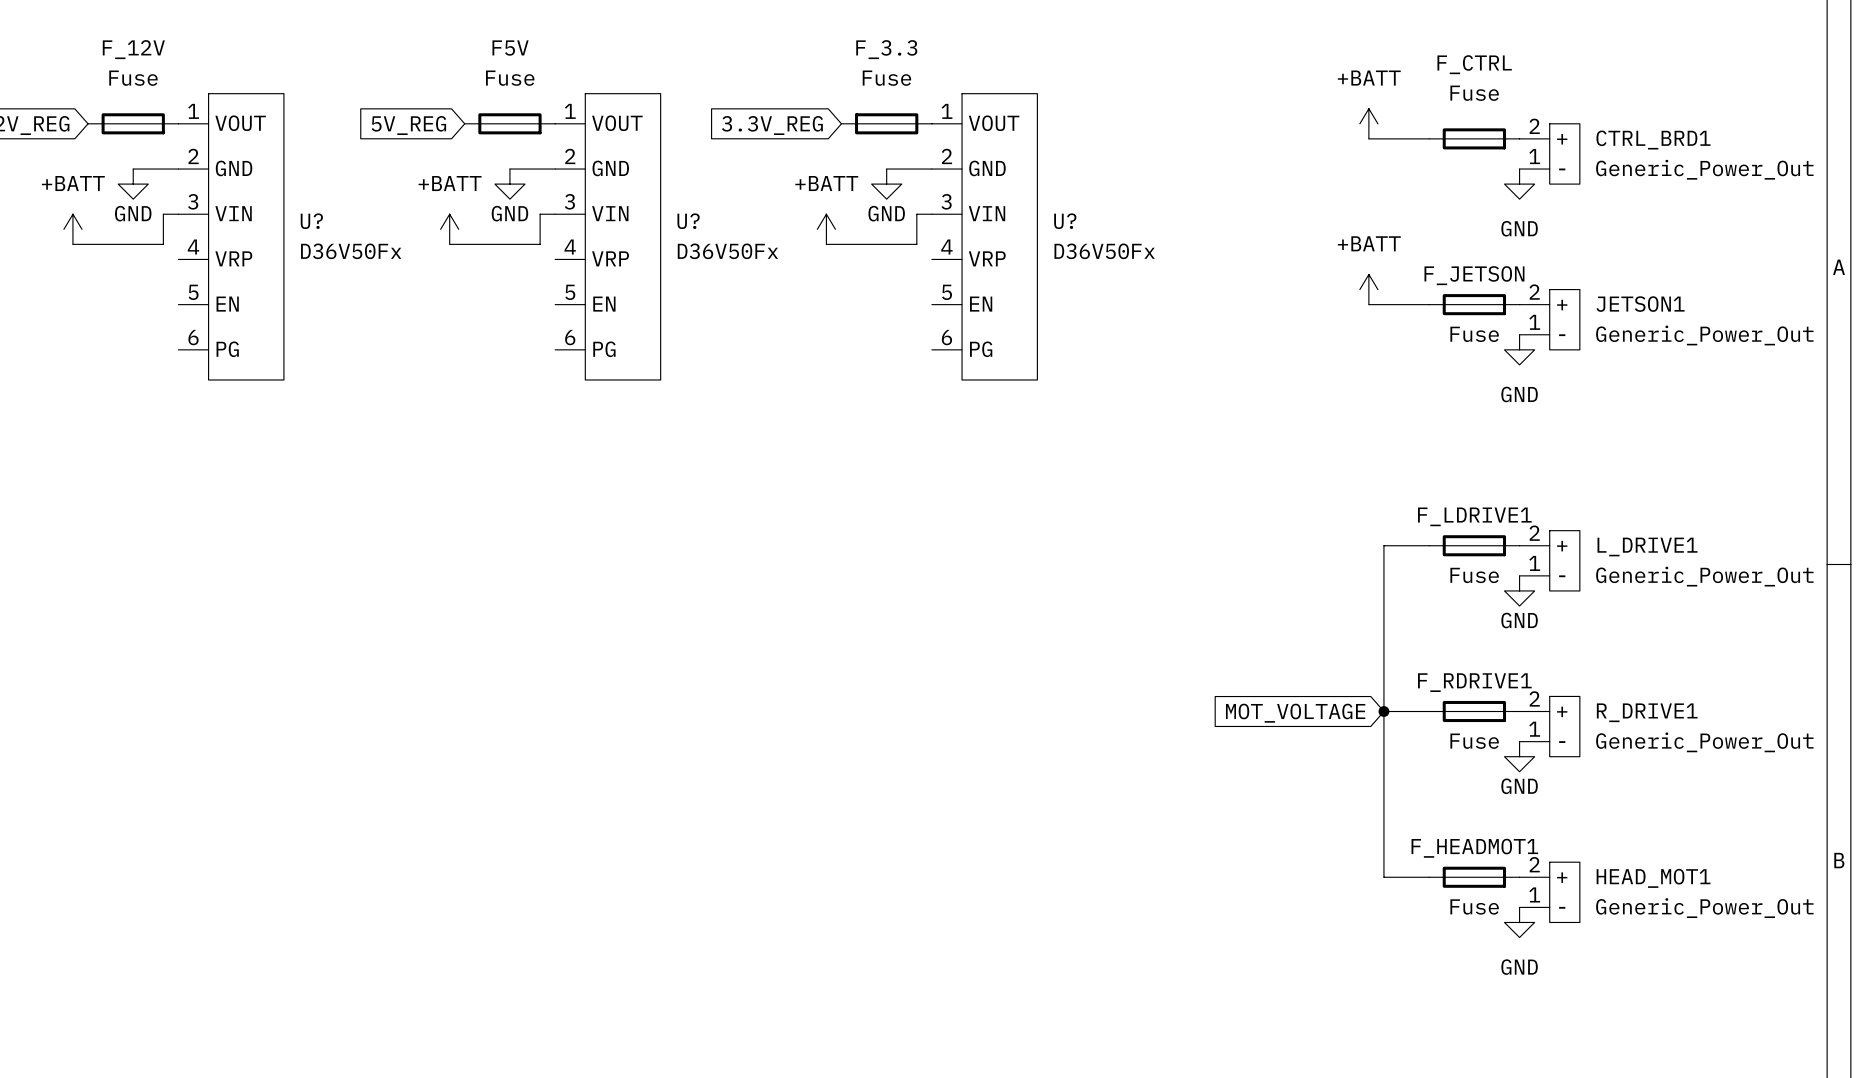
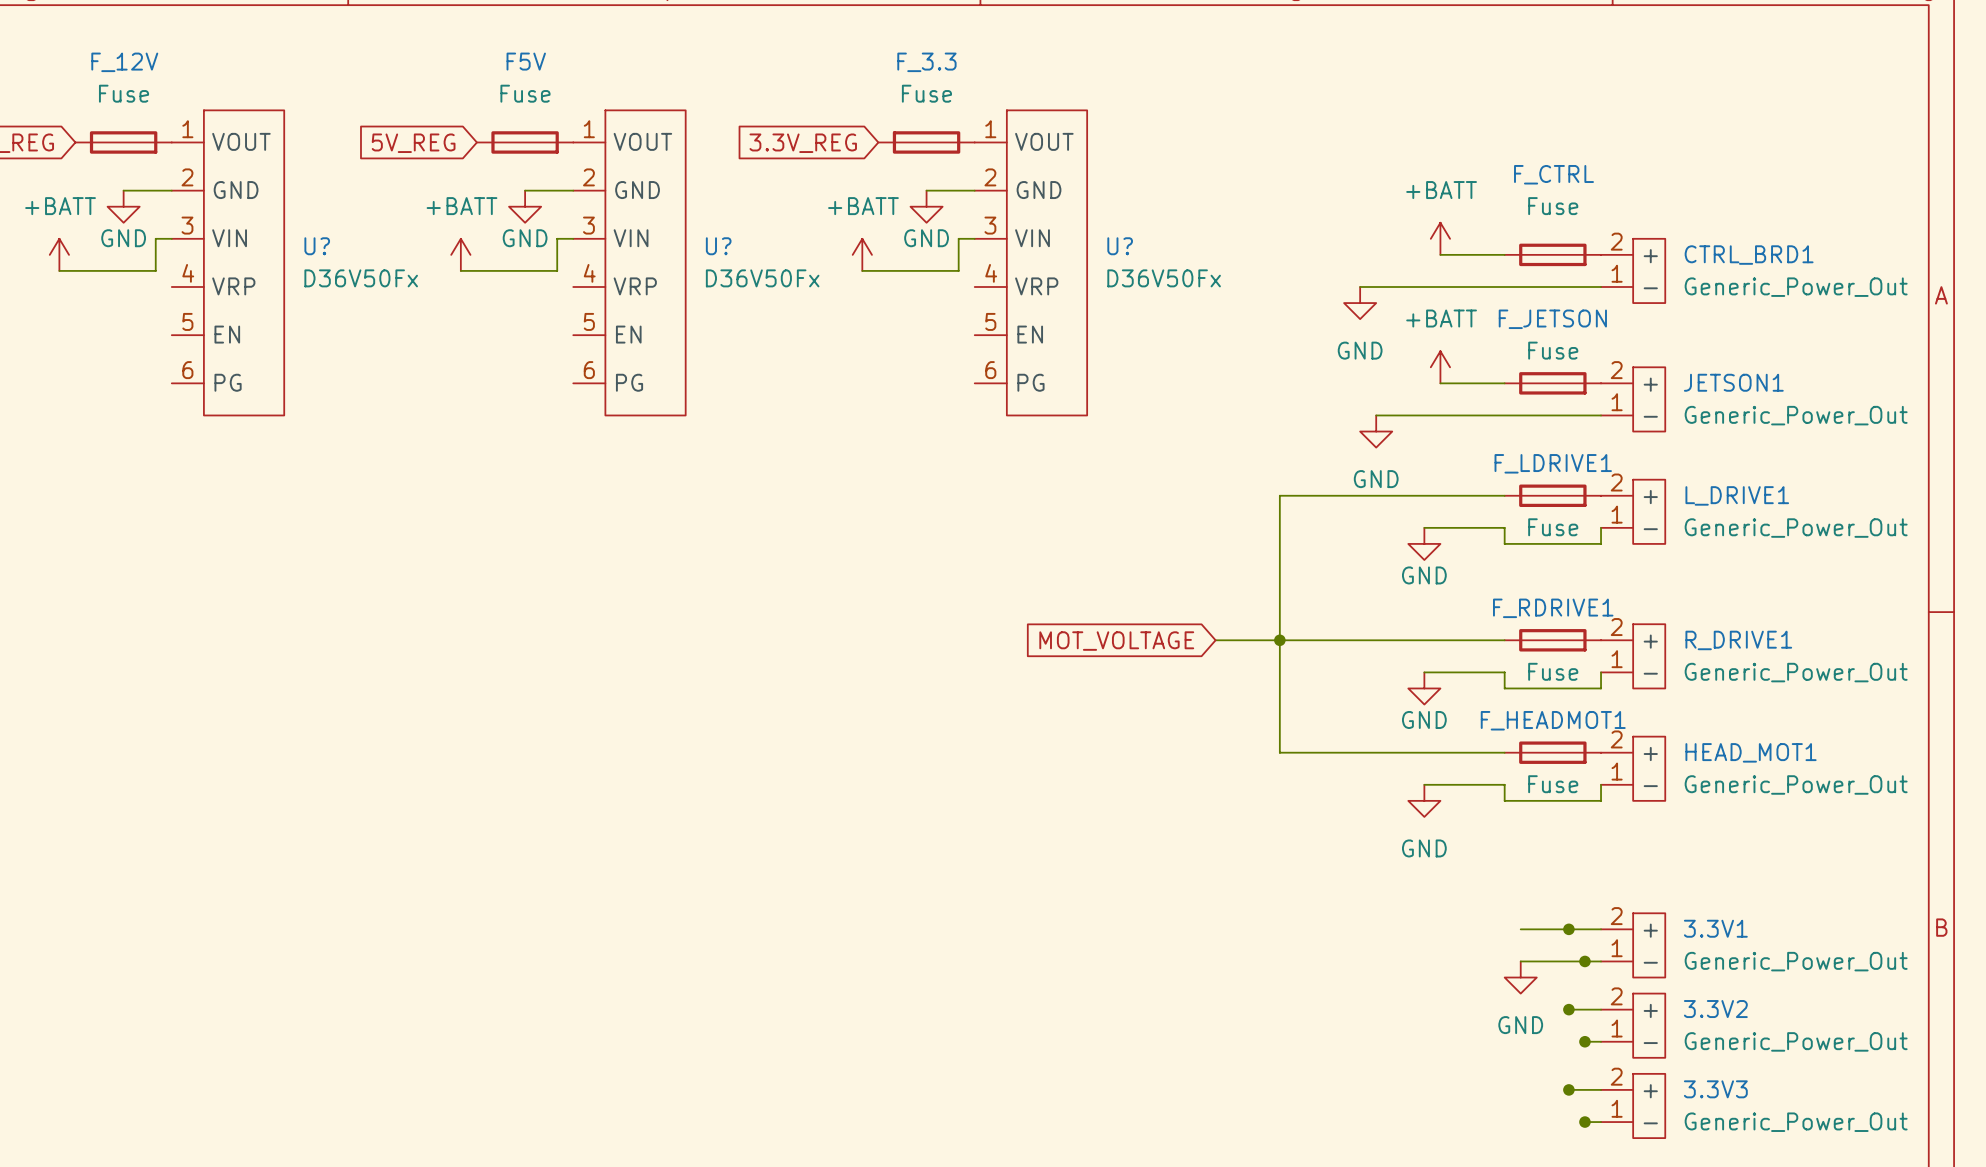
power symbol: +BATT (1368, 123) -> none
wire: (1368, 138) (1429, 138) -> (1440, 254) (1504, 254)
F_CTRL position: (1474, 138) -> (1552, 254)
CTRL_BRD1 position: (1549, 153) -> (1633, 270)
power symbol: GND (1519, 184) -> none
power symbol: none -> +BATT (1440, 238)
wire: none -> (1360, 287) (1601, 287)
power symbol: none -> GND (1360, 303)
F_JETSON name position: F_JETSON (1474, 275) -> F_JETSON (1552, 319)
power symbol: +BATT (1368, 289) -> none
wire: (1368, 304) (1429, 304) -> (1440, 383) (1504, 383)
F_JETSON position: (1474, 304) -> (1552, 383)
JETSON1 position: (1549, 319) -> (1633, 399)
power symbol: none -> +BATT (1440, 367)
F_JETSON value position: Fuse (1474, 334) -> Fuse (1553, 350)
power symbol: GND (1519, 349) -> none
wire: none -> (1376, 415) (1601, 415)
power symbol: none -> GND (1376, 431)
wire: none -> (1504, 495) (1279, 495) (1279, 752) (1504, 752)
wire: none -> (1424, 527) (1504, 527) (1504, 543) (1601, 543) (1601, 527)
power symbol: none -> GND (1424, 543)
wire: (1429, 545) (1383, 545) (1383, 877) (1429, 877) -> none
F_LDRIVE1 position: (1474, 545) -> (1552, 495)
L_DRIVE1 position: (1549, 560) -> (1633, 511)
wire: none -> (1215, 640) (1504, 640)
junction: none -> (1279, 640)
power symbol: GND (1519, 590) -> none
wire: none -> (1424, 672) (1504, 672) (1504, 688) (1601, 688) (1601, 672)
power symbol: none -> GND (1424, 688)
wire: (1383, 711) (1429, 711) -> none
junction: (1383, 711) -> none
F_RDRIVE1 position: (1474, 711) -> (1552, 640)
global label position: MOT_VOLTAGE (1295, 713) -> MOT_VOLTAGE (1116, 641)
wire: none -> (1424, 784) (1504, 784) (1504, 800) (1601, 800) (1601, 784)
R_DRIVE1 position: (1549, 726) -> (1633, 656)
power symbol: none -> GND (1424, 800)
power symbol: GND (1519, 756) -> none
wire: none -> (1520, 929) (1601, 929)
junction: none -> (1568, 929)
F_HEADMOT1 position: (1474, 877) -> (1552, 752)
3.3V1: none -> Generic_Power_Out (1633, 945)
wire: none -> (1520, 961) (1601, 961)
junction: none -> (1584, 961)
HEAD_MOT1 position: (1549, 892) -> (1633, 768)
power symbol position: GND (1519, 922) -> GND (1520, 977)
wire: none -> (1568, 1009) (1601, 1009)
junction: none -> (1568, 1009)
3.3V2: none -> Generic_Power_Out (1633, 1025)
wire: none -> (1584, 1041) (1601, 1041)
junction: none -> (1584, 1041)
wire: none -> (1568, 1089) (1601, 1089)
junction: none -> (1568, 1089)
3.3V3: none -> Generic_Power_Out (1633, 1105)
wire: none -> (1584, 1122) (1601, 1122)
junction: none -> (1584, 1122)

